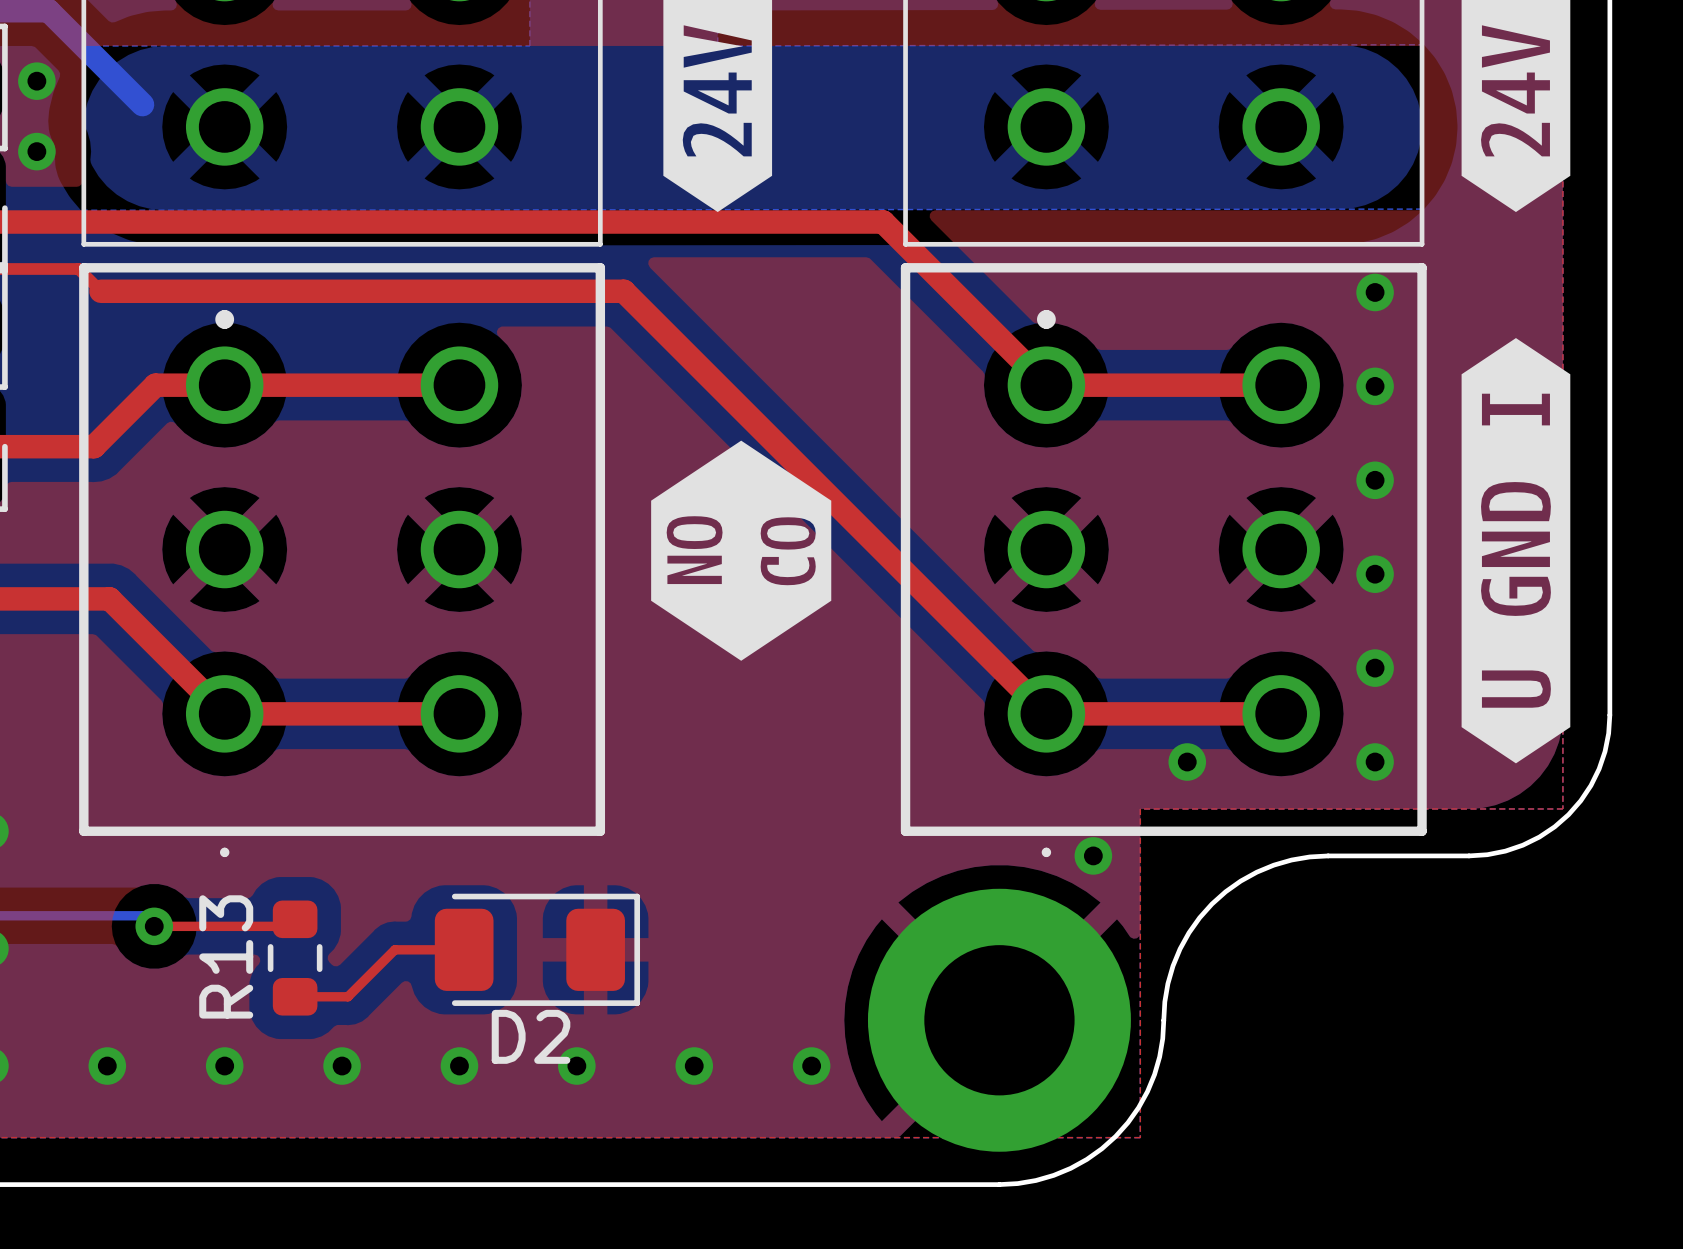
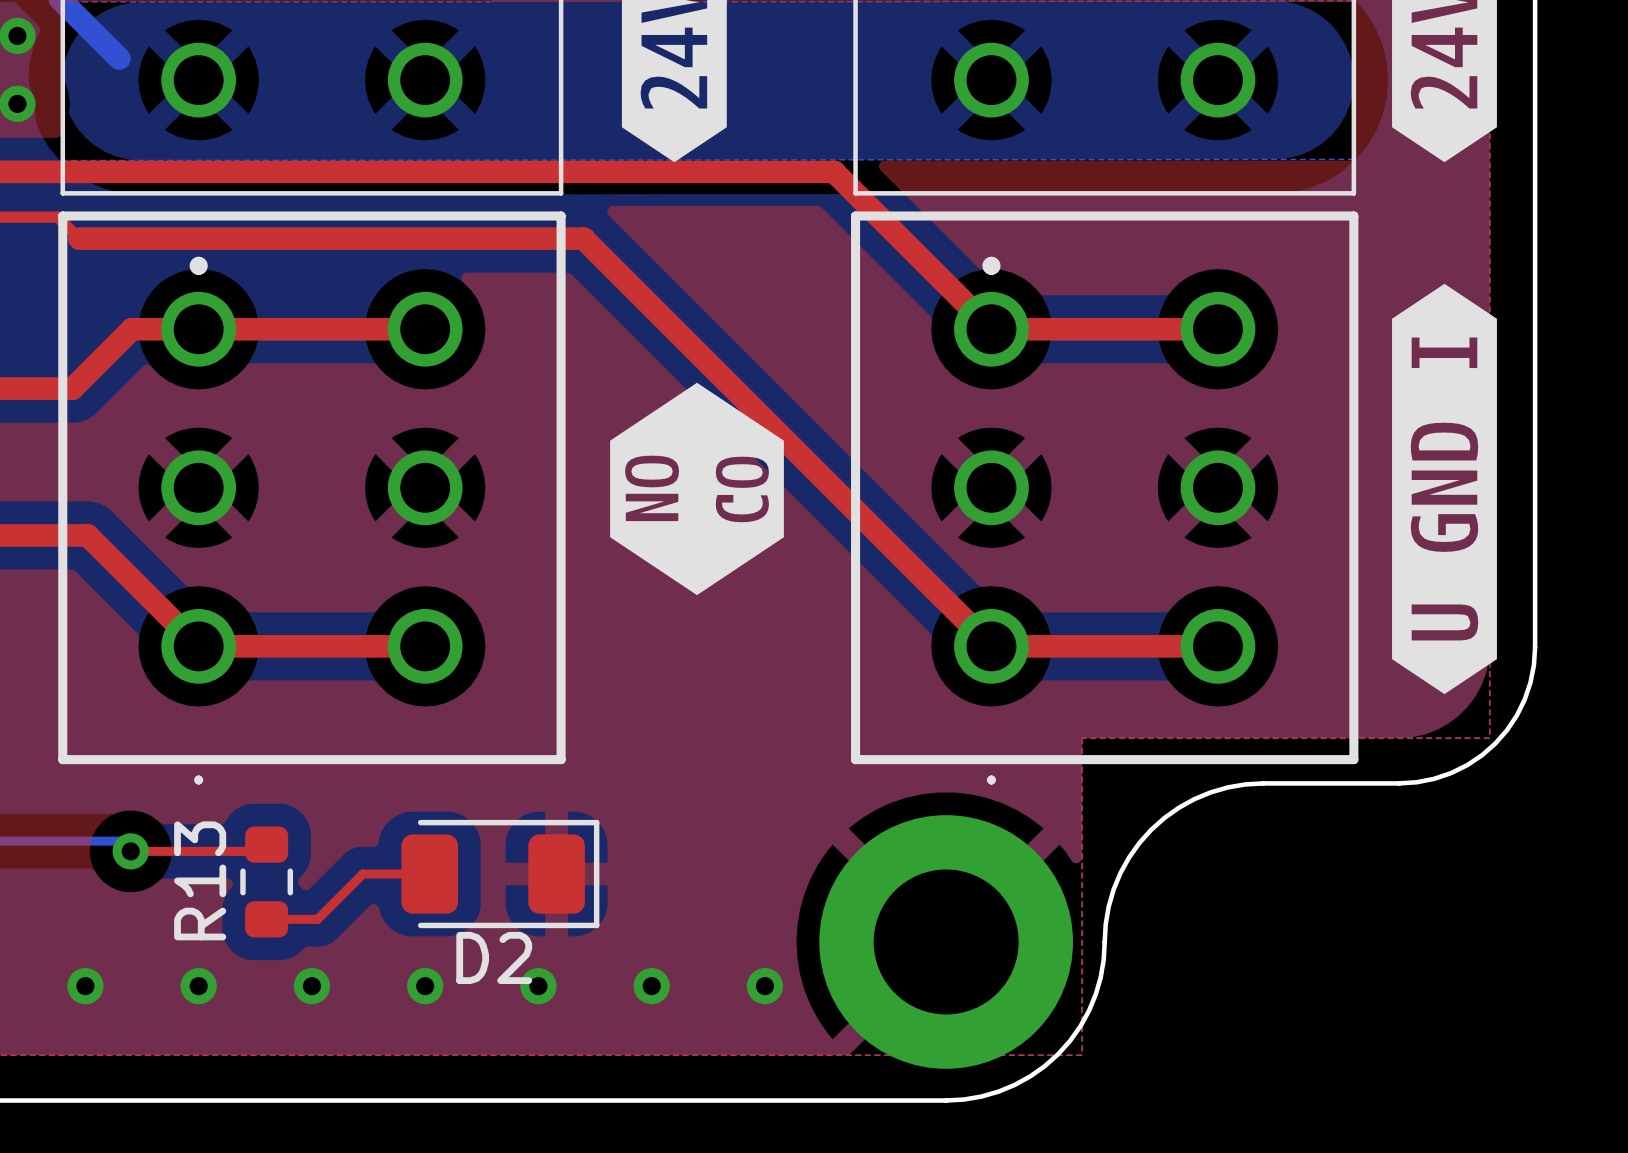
via: (1375, 292) -> none
via: (1375, 386) -> none
via: (1375, 480) -> none
via: (1375, 574) -> none
via: (1375, 668) -> none
via: (1187, 762) -> none
via: (1375, 762) -> none
via: (1093, 855) -> none

